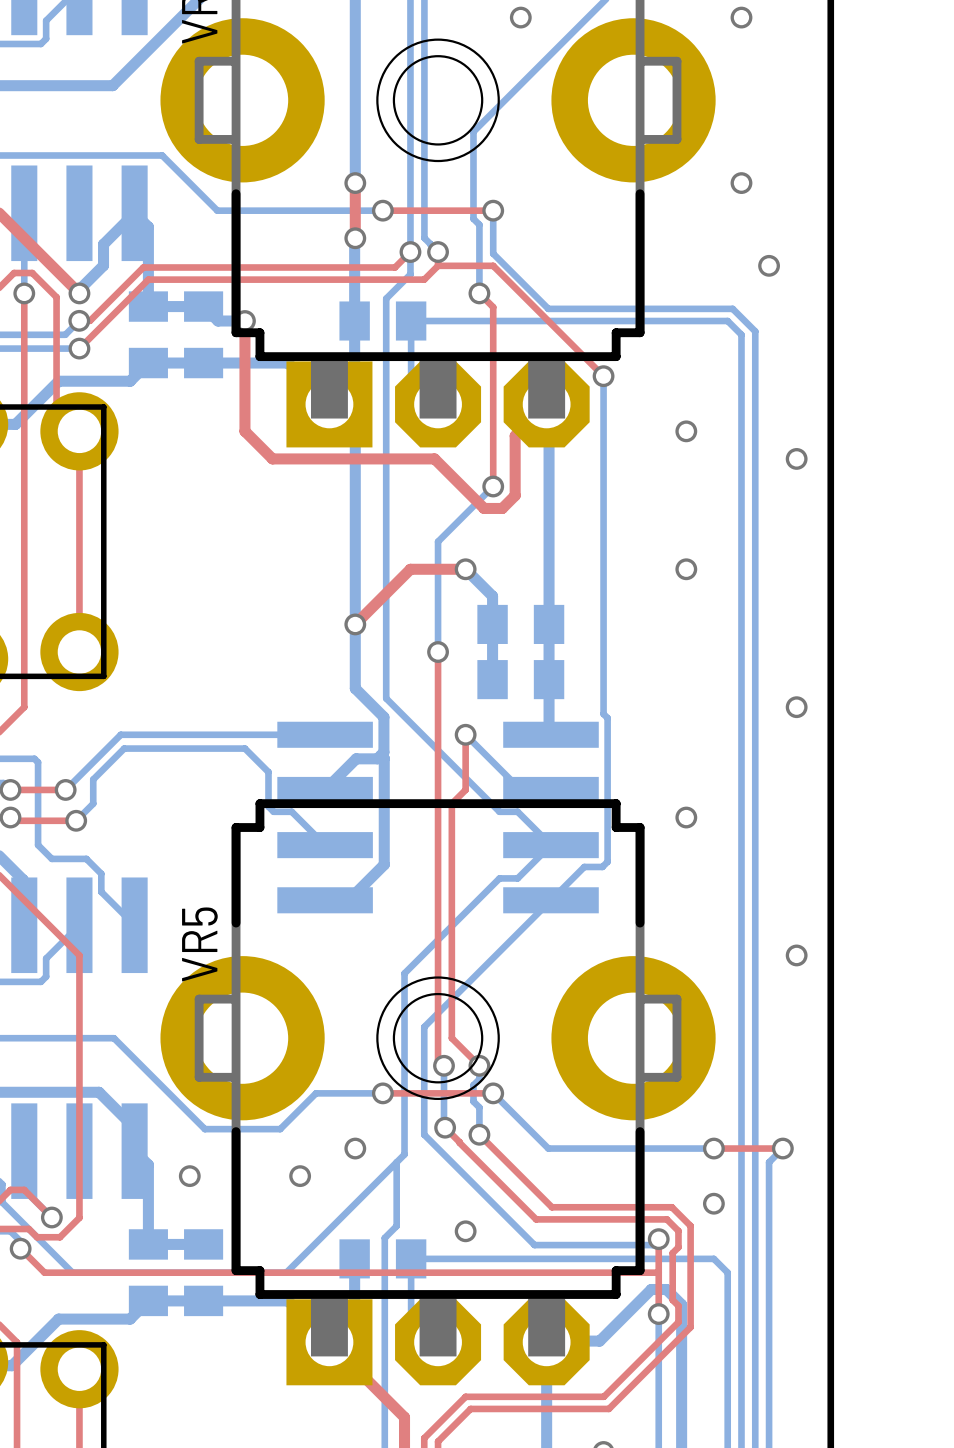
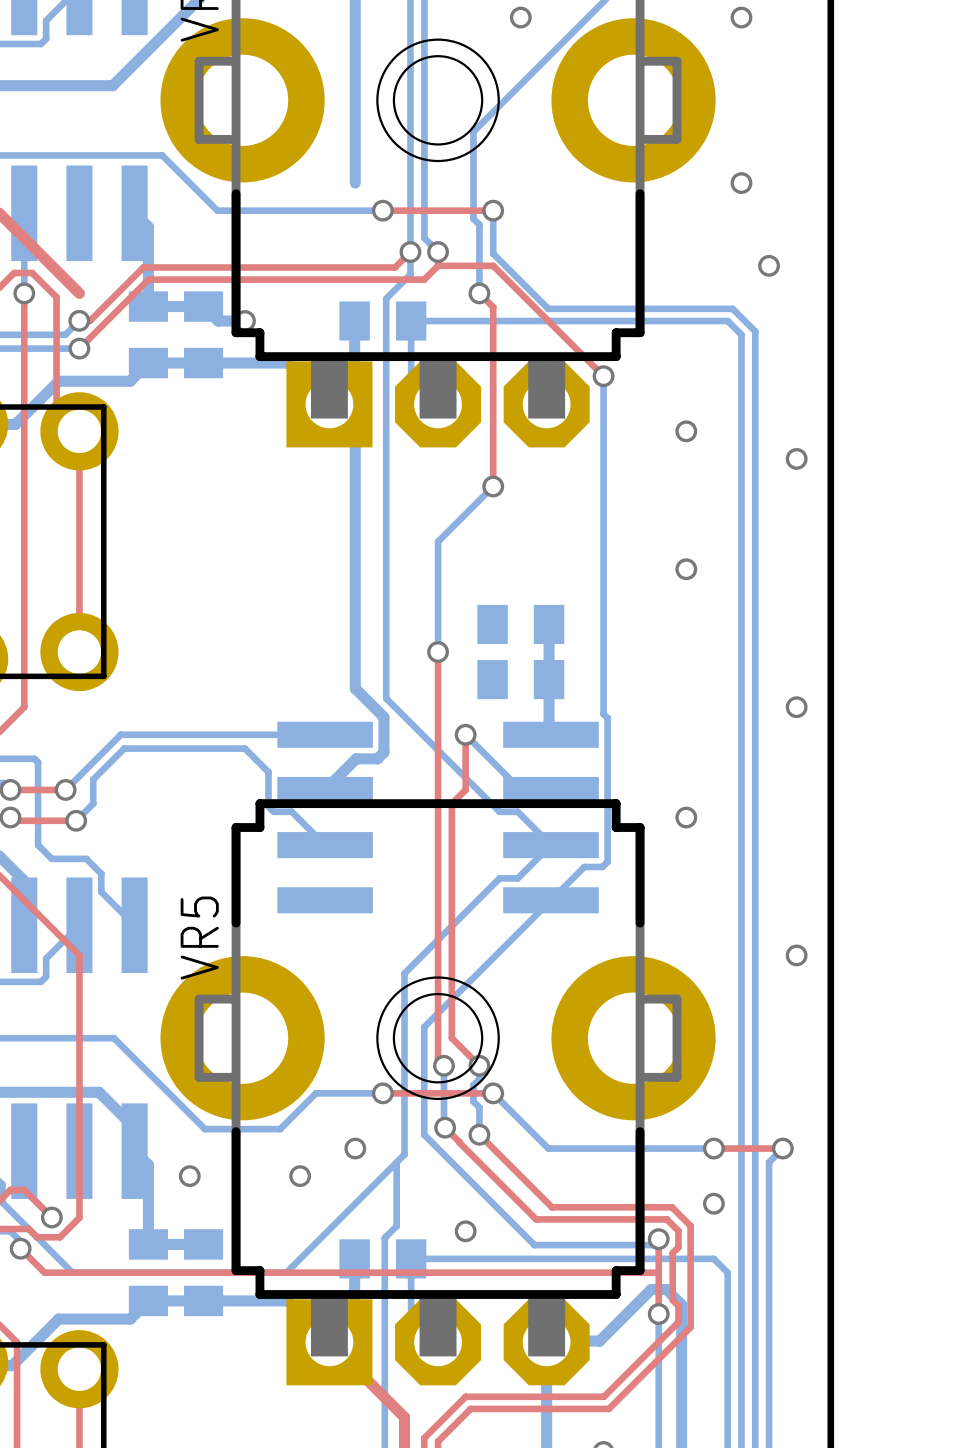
top track: (355, 183) (355, 238) -> none
via: (355, 183) -> none
bottom track: (134, 213) (103, 244) (103, 265) (79, 289) (79, 293) -> none
bottom track: (355, 238) (354, 321) -> none
via: (355, 238) -> none
via: (79, 293) -> none
top track: (244, 321) (244, 431) (272, 458) (434, 458) (484, 508) (502, 508) (515, 495) (515, 435) (546, 404) -> none
bottom track: (546, 404) (549, 406) (549, 624) -> none
bottom track: (465, 569) (492, 596) (492, 679) -> none
top track: (465, 569) (410, 569) (355, 624) -> none
via: (465, 569) -> none
via: (355, 624) -> none
bottom track: (381, 755) (384, 758) (384, 864) (350, 898) (326, 898) (325, 900) -> none

